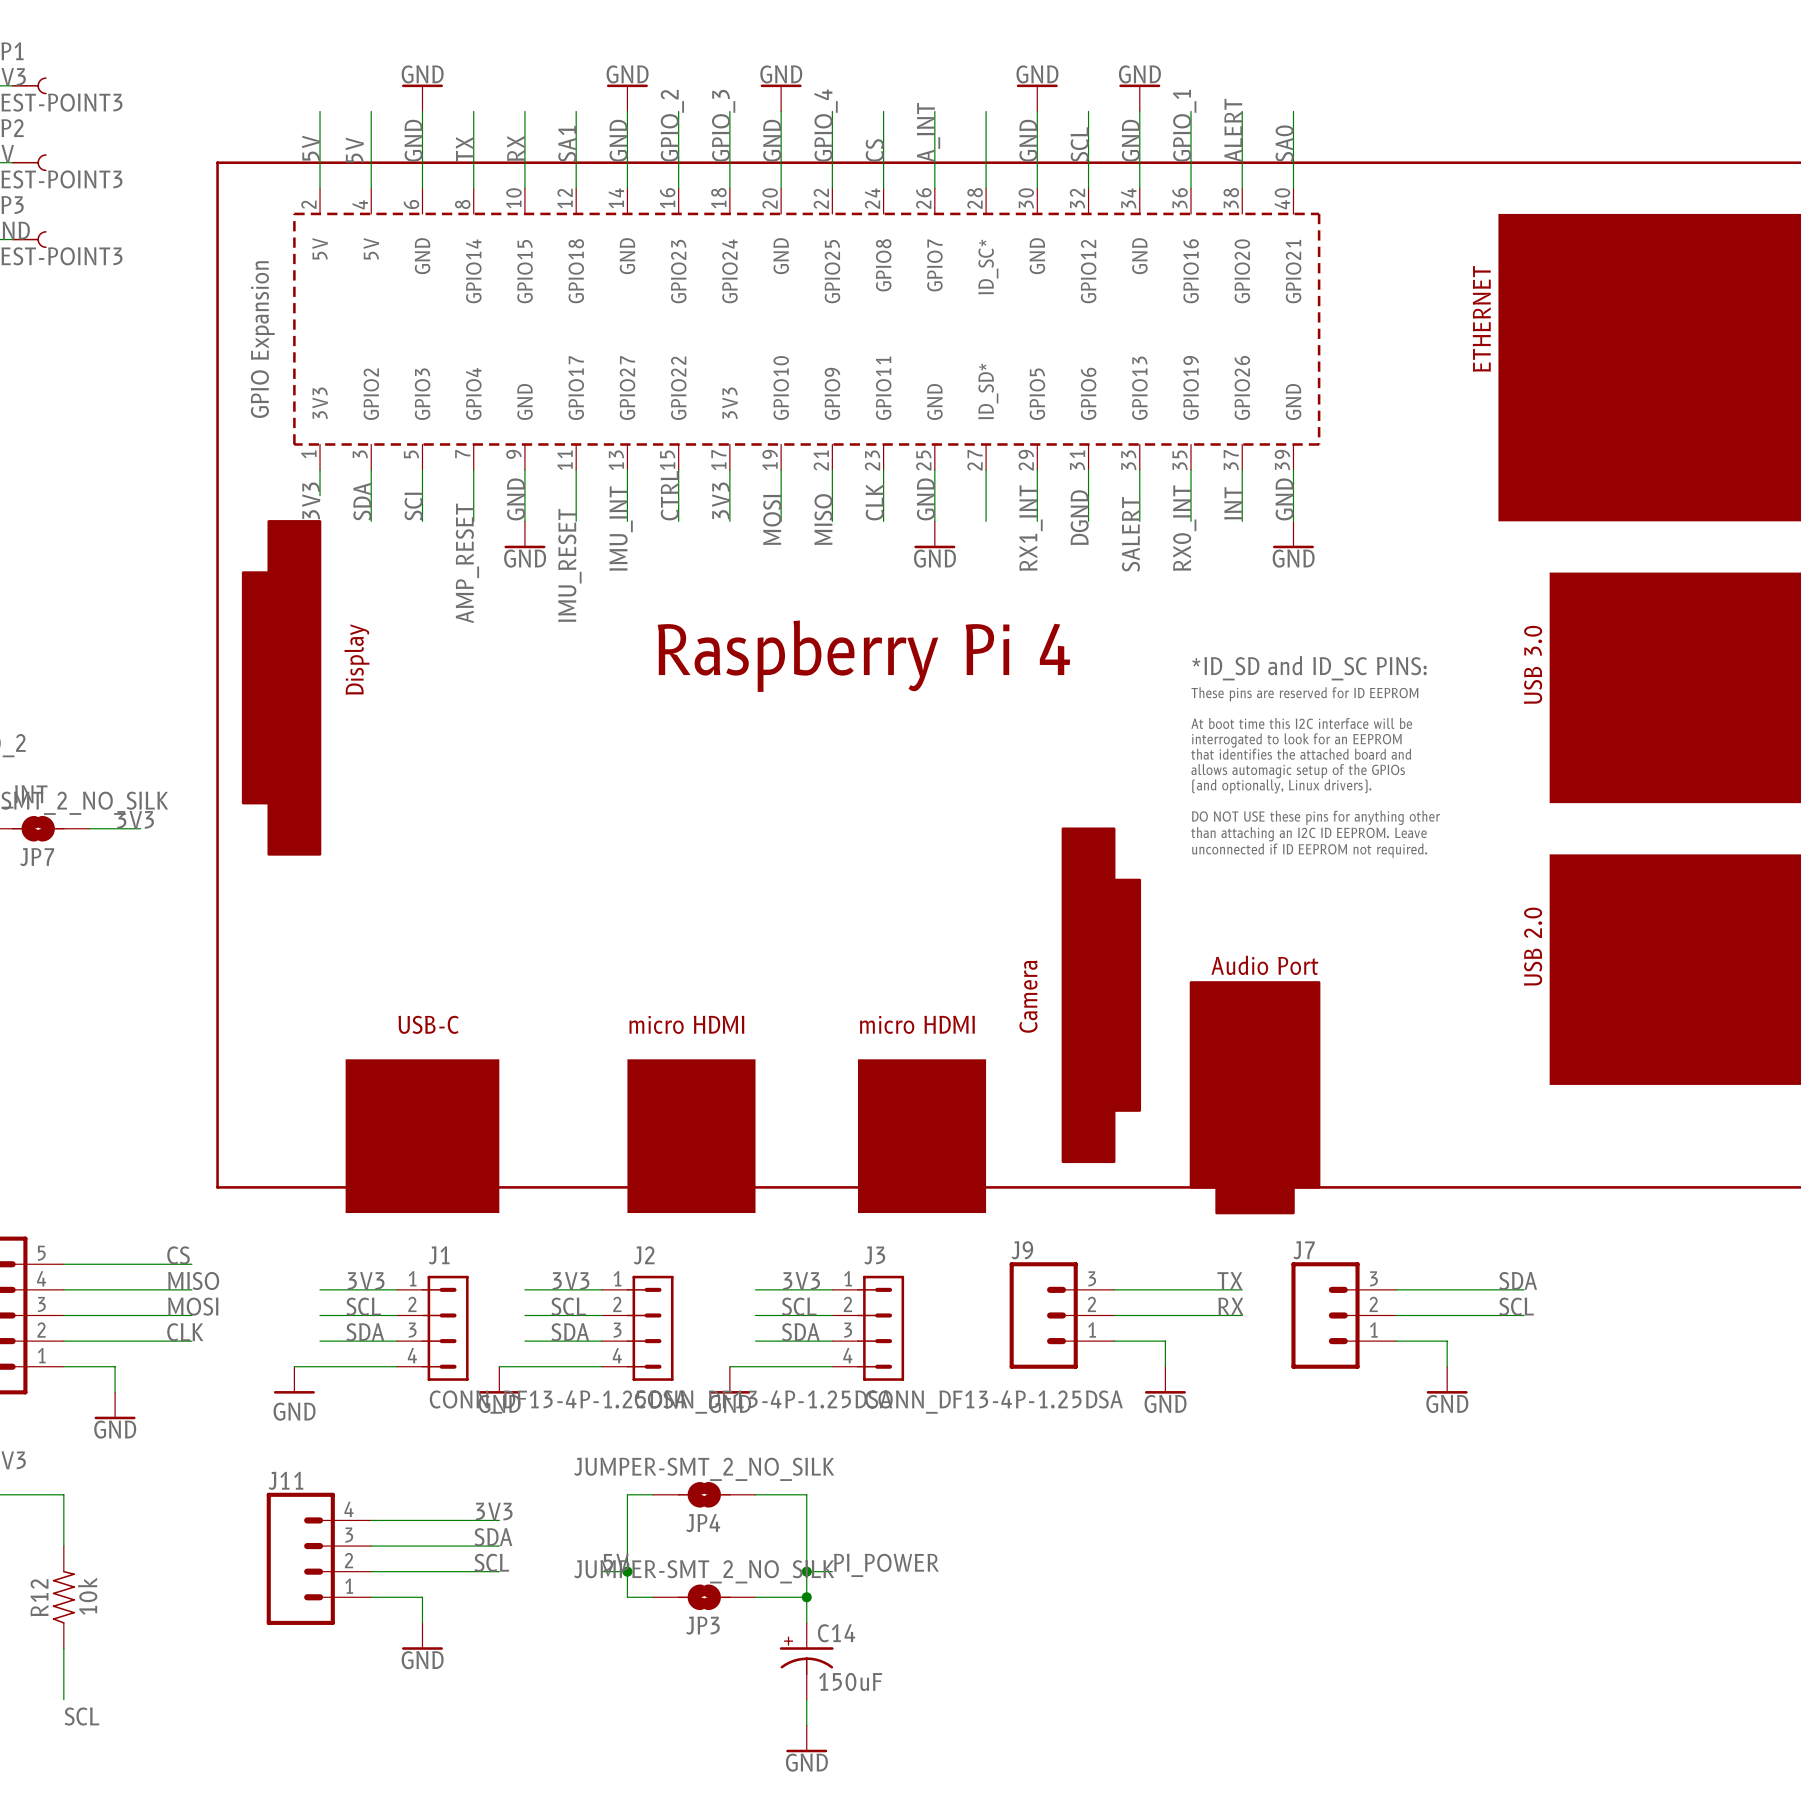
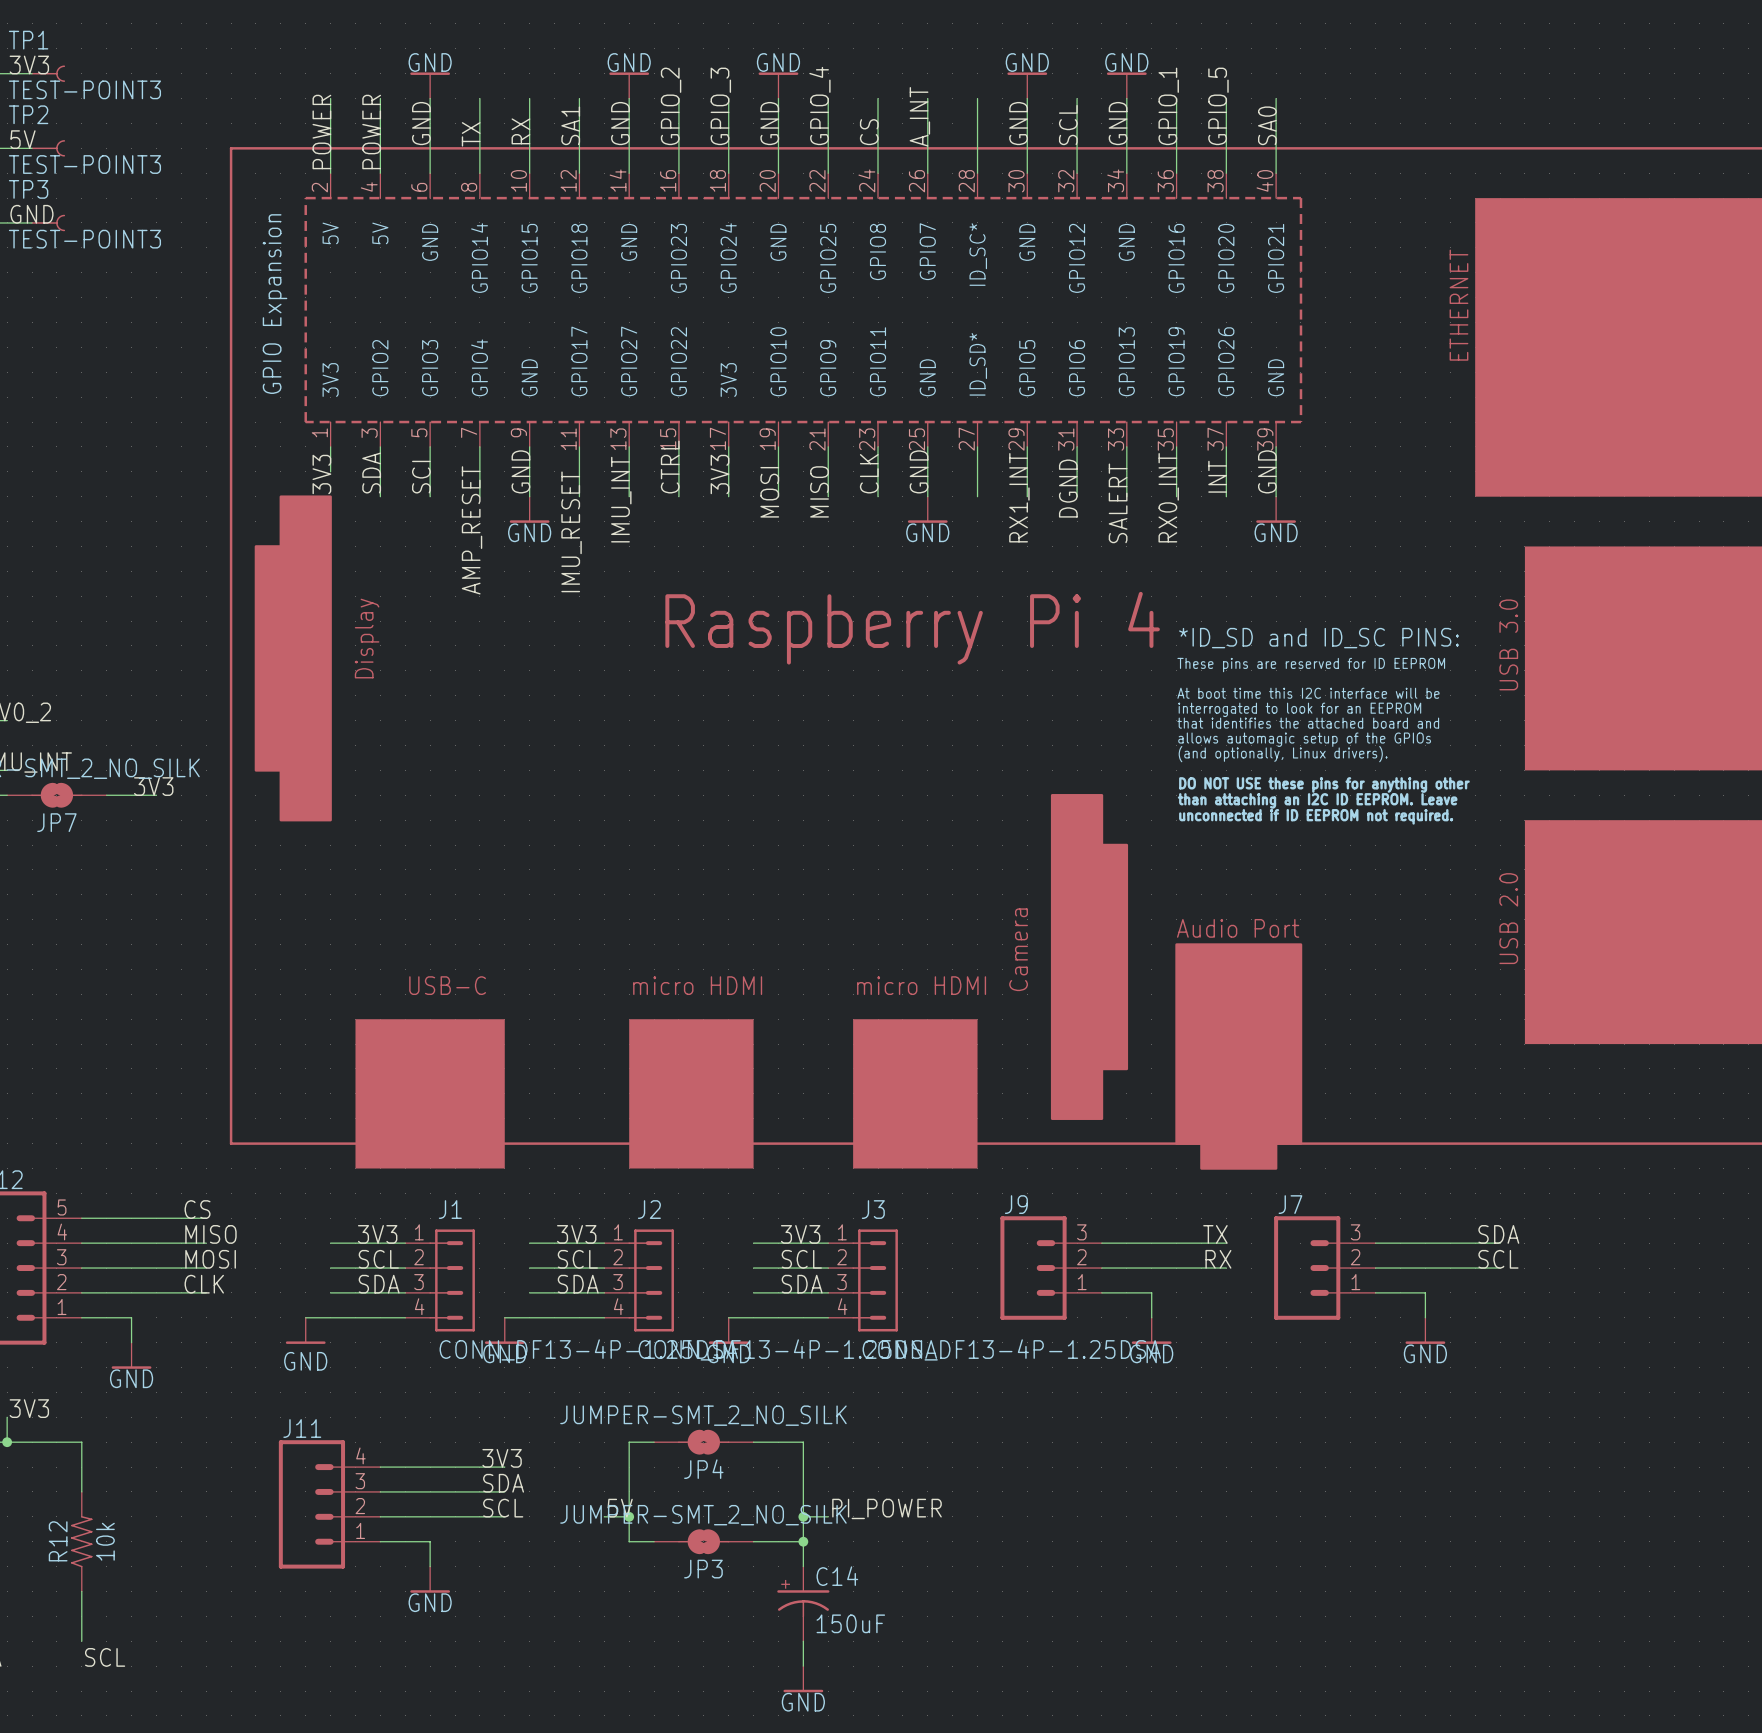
label: ALERT (1233, 130) -> GPIO_5 (1218, 106)
label: 5V (311, 148) -> none
label: none -> POWER (321, 132)
label: none -> POWER (371, 132)
label: 5V (354, 150) -> none

